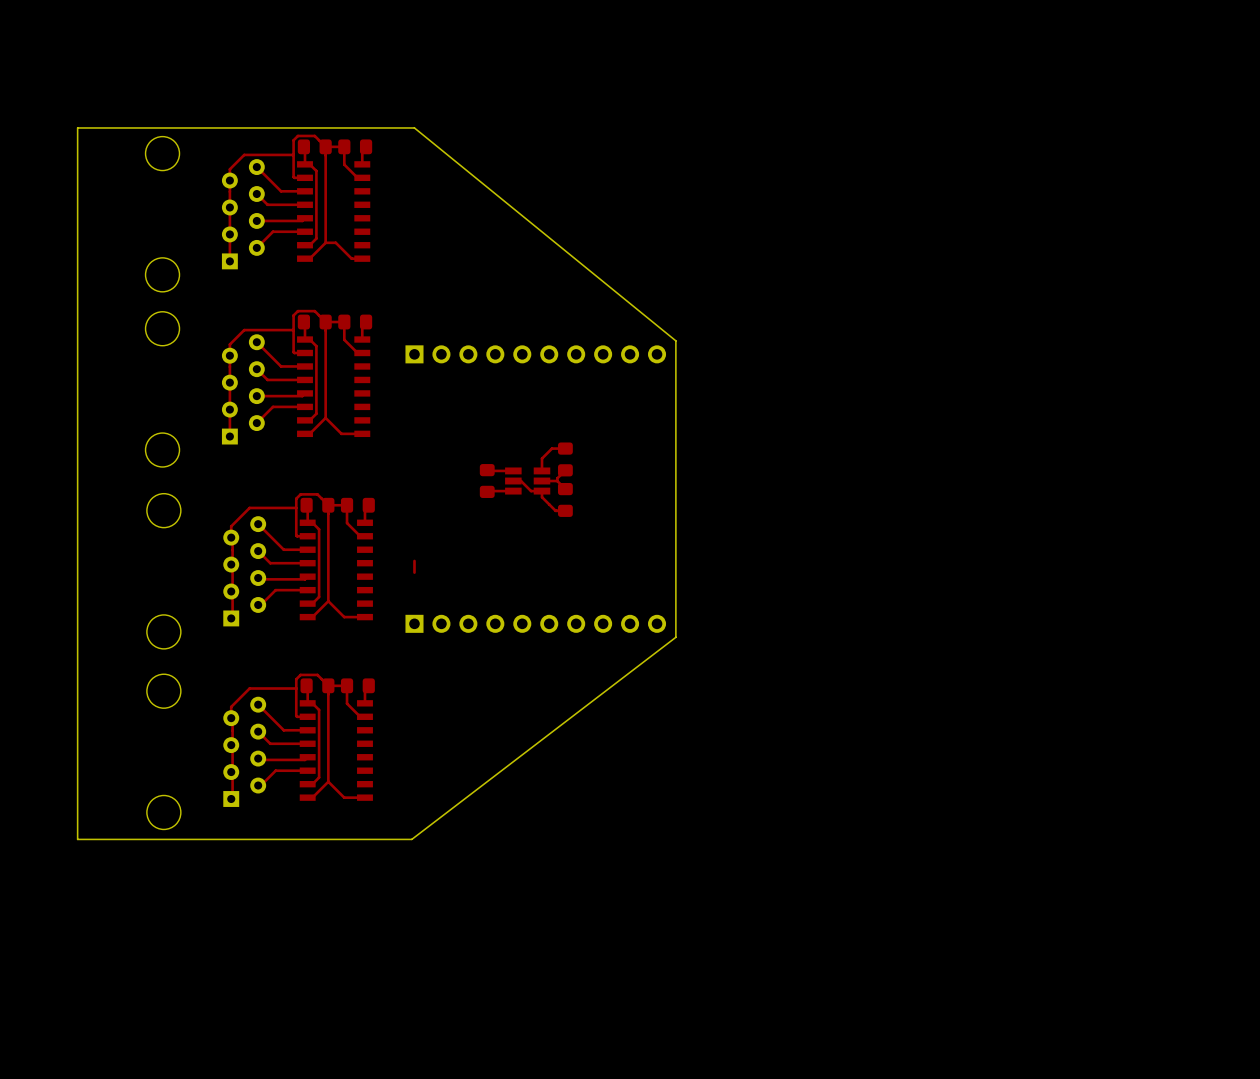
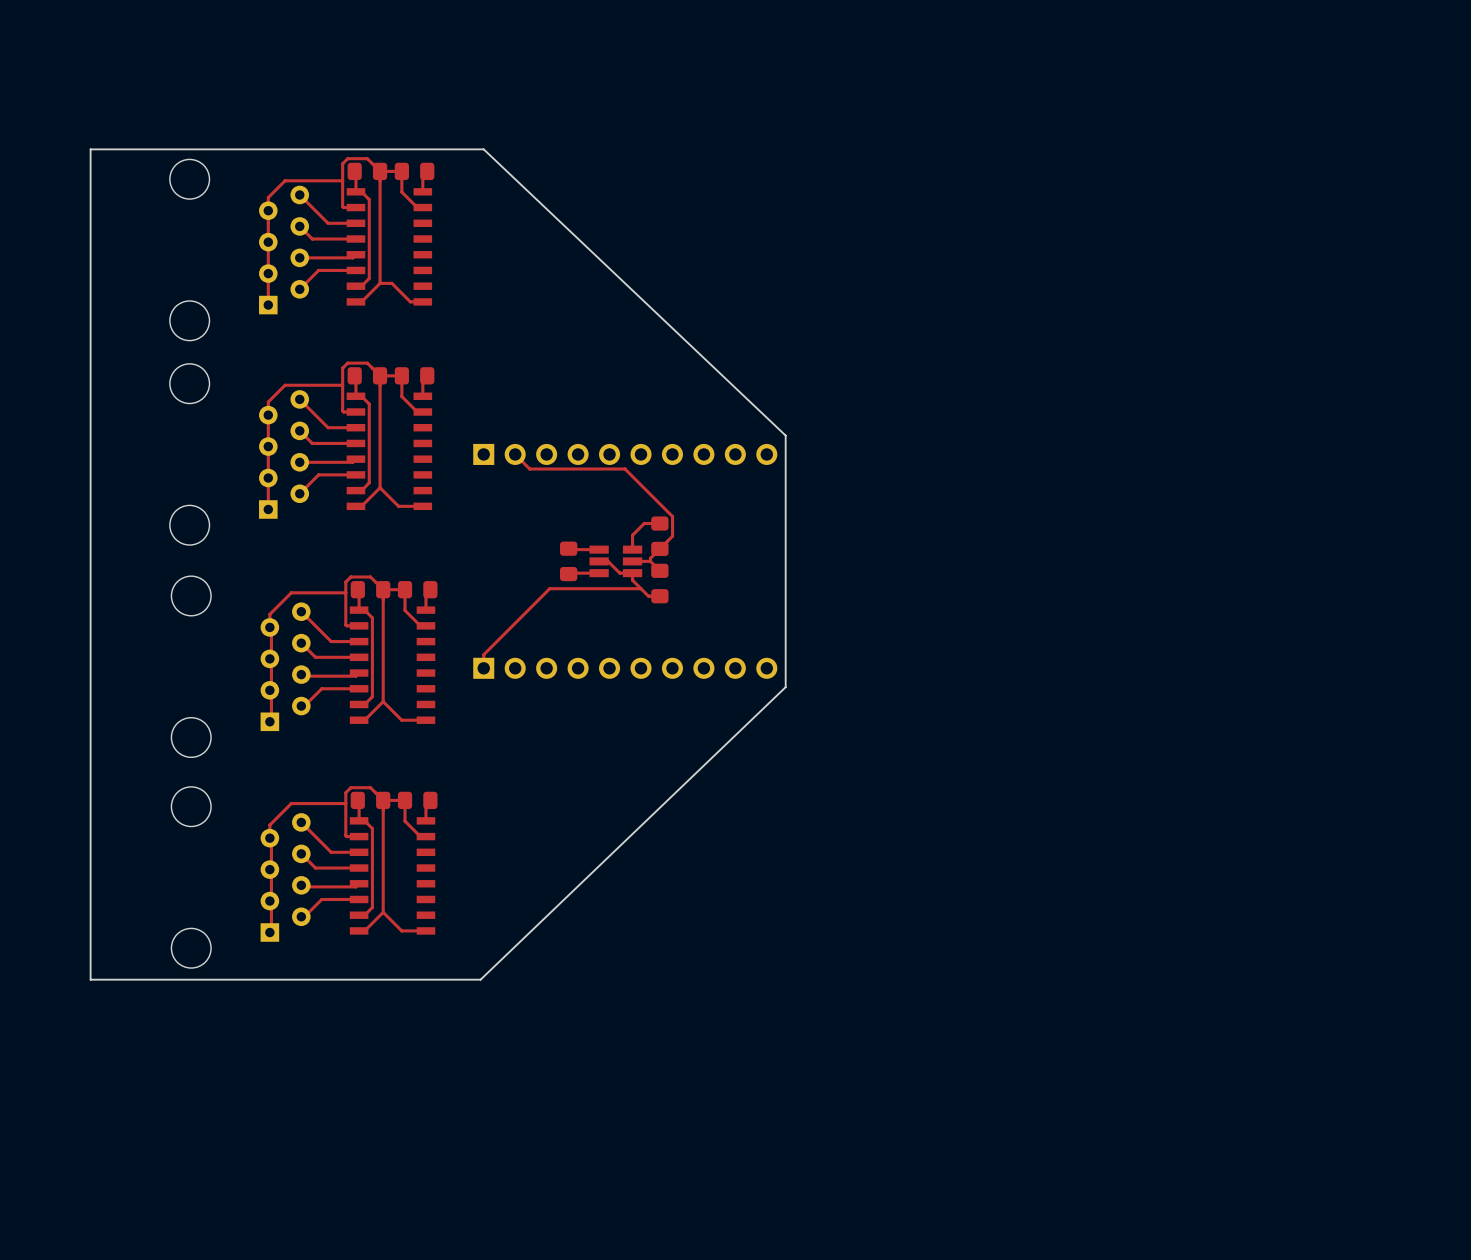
board edge: (414, 127) (675, 340) (675, 637) (411, 839) -> (483, 149) (785, 435) (785, 687) (480, 979)
part position: (535, 354) -> (625, 454)
top track: none -> (515, 454) (529, 468) (625, 468) (672, 516) (672, 536) (659, 548)
top track: none -> (641, 588) (549, 588) (483, 654)
part position: (535, 623) -> (625, 668)

